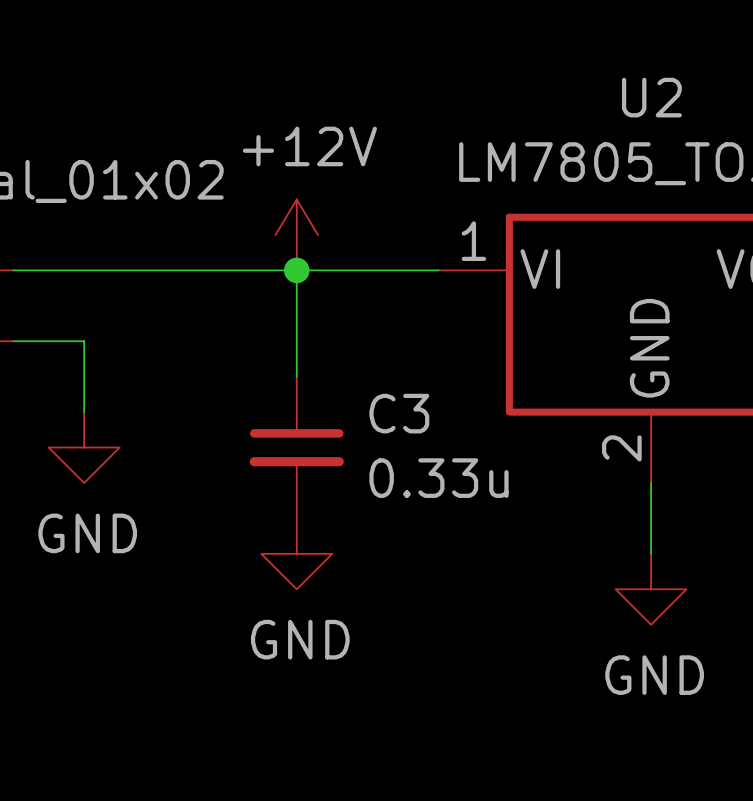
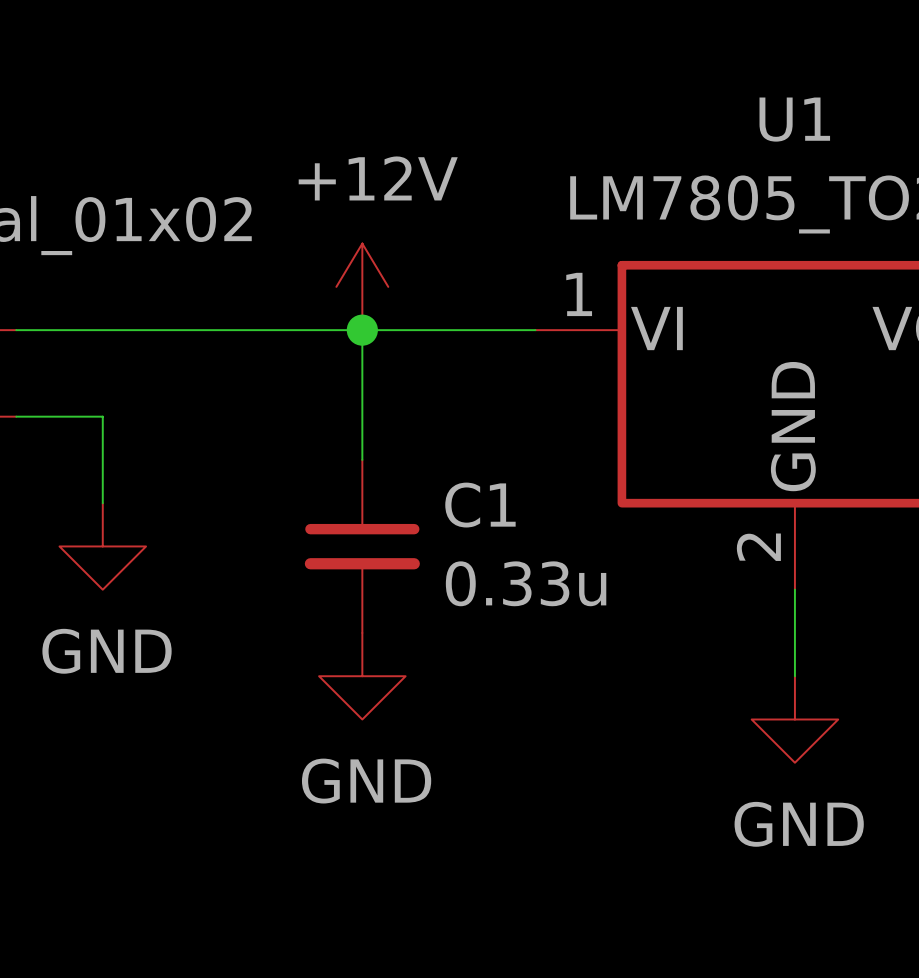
U2 name: U2 (651, 97) -> U1 (794, 119)
C3 name: C3 (399, 413) -> C1 (480, 505)

